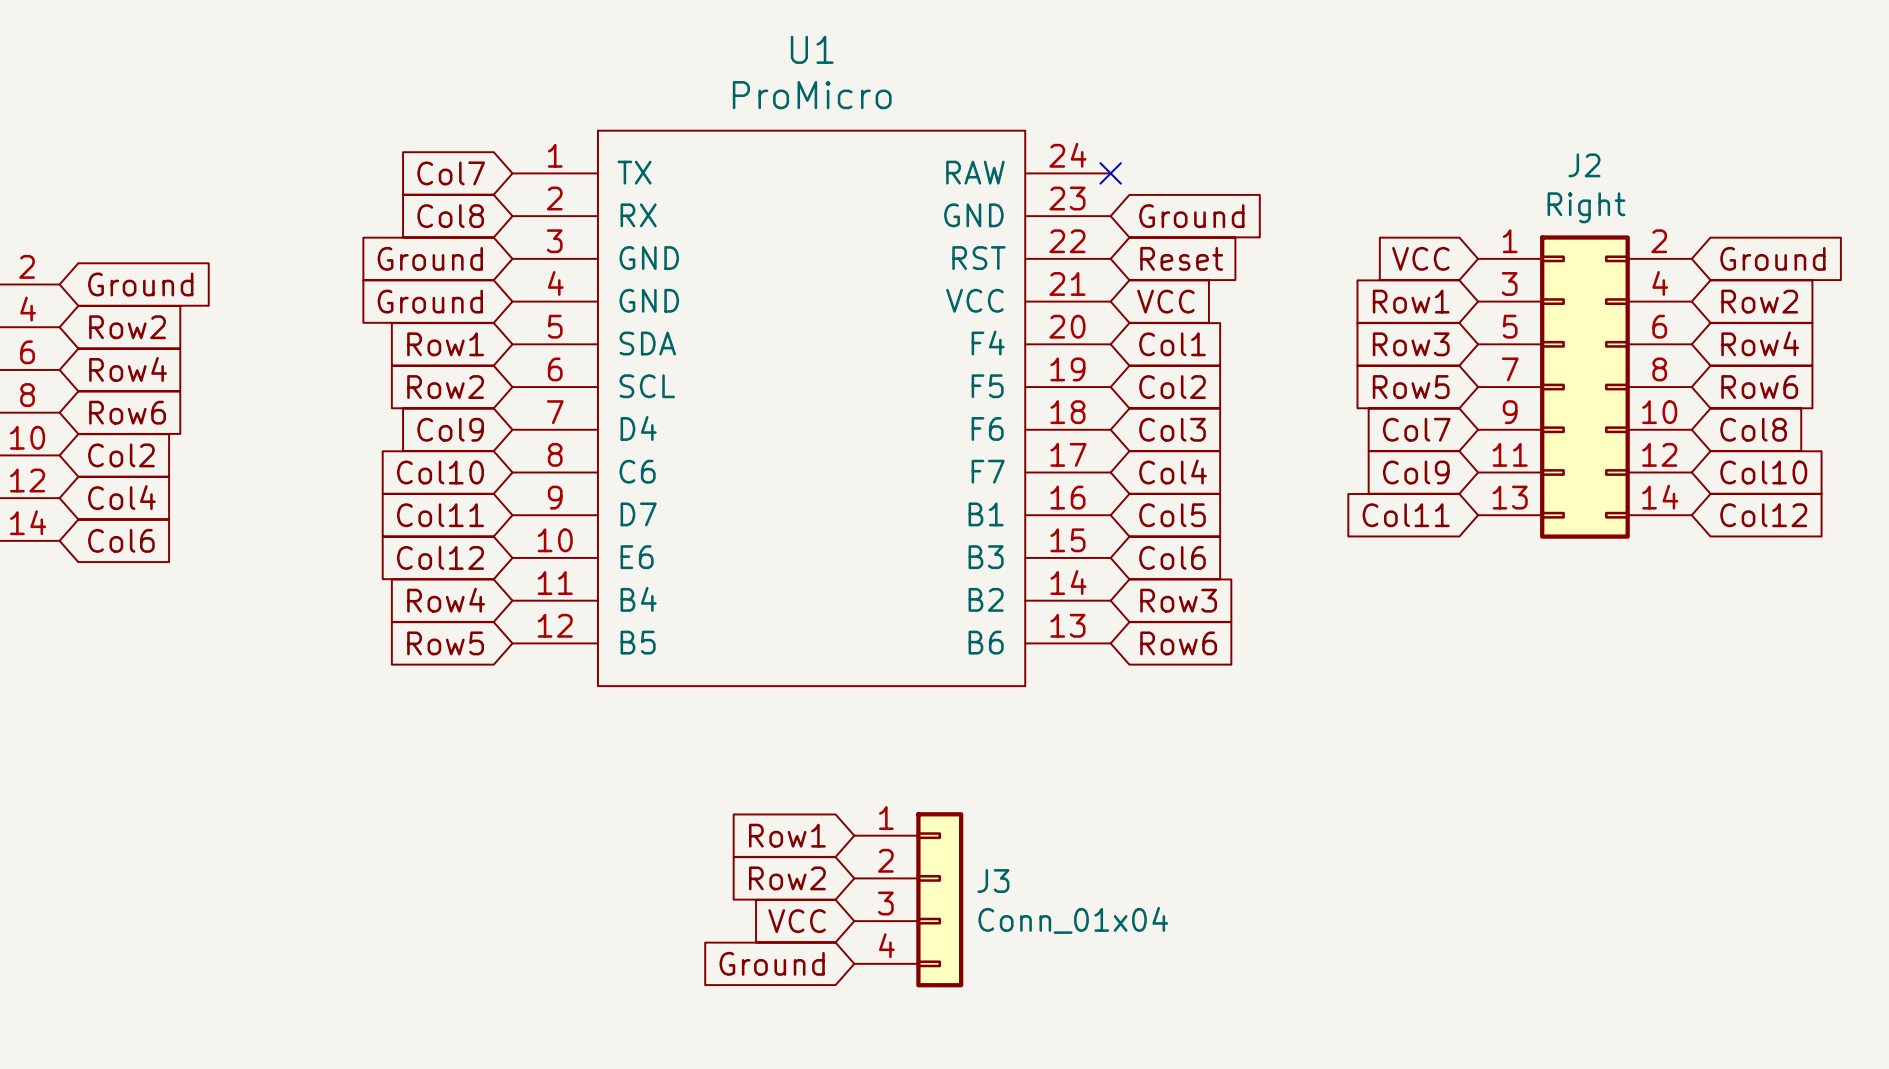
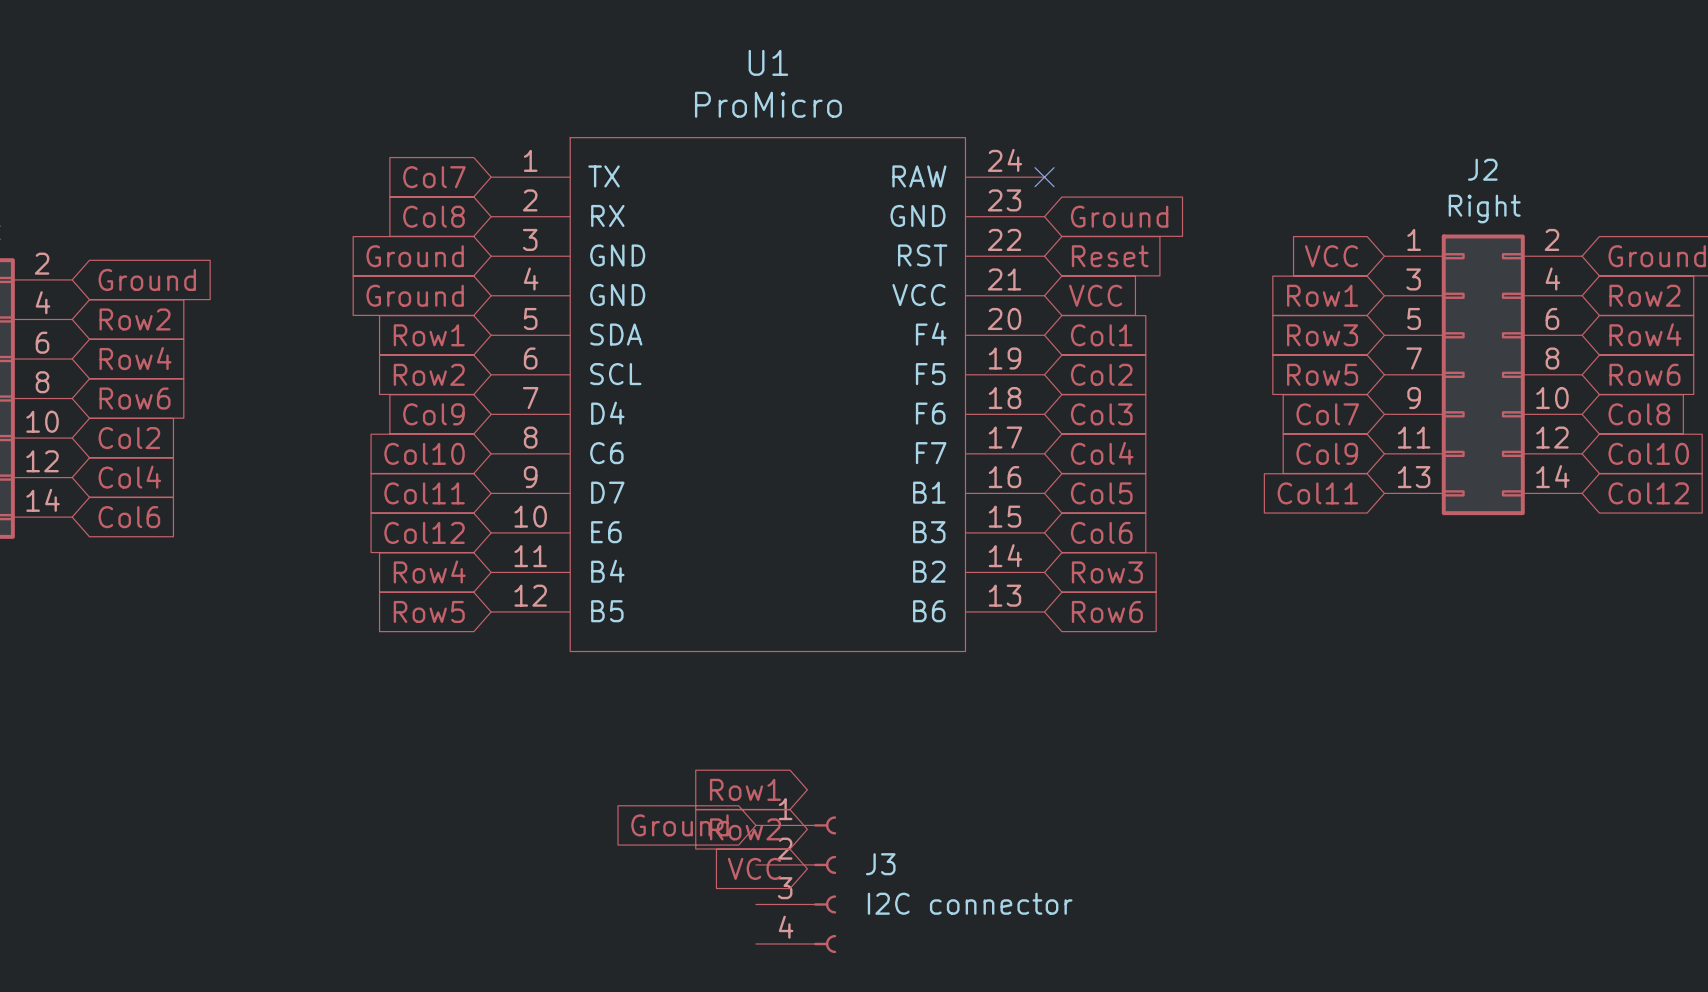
J3 symbol: [854, 812, 964, 988] -> [755, 816, 837, 954]
J3 value: Conn_01x04 (1073, 920) -> I2C connector (970, 903)
global label position: Ground (772, 963) -> Ground (679, 825)

